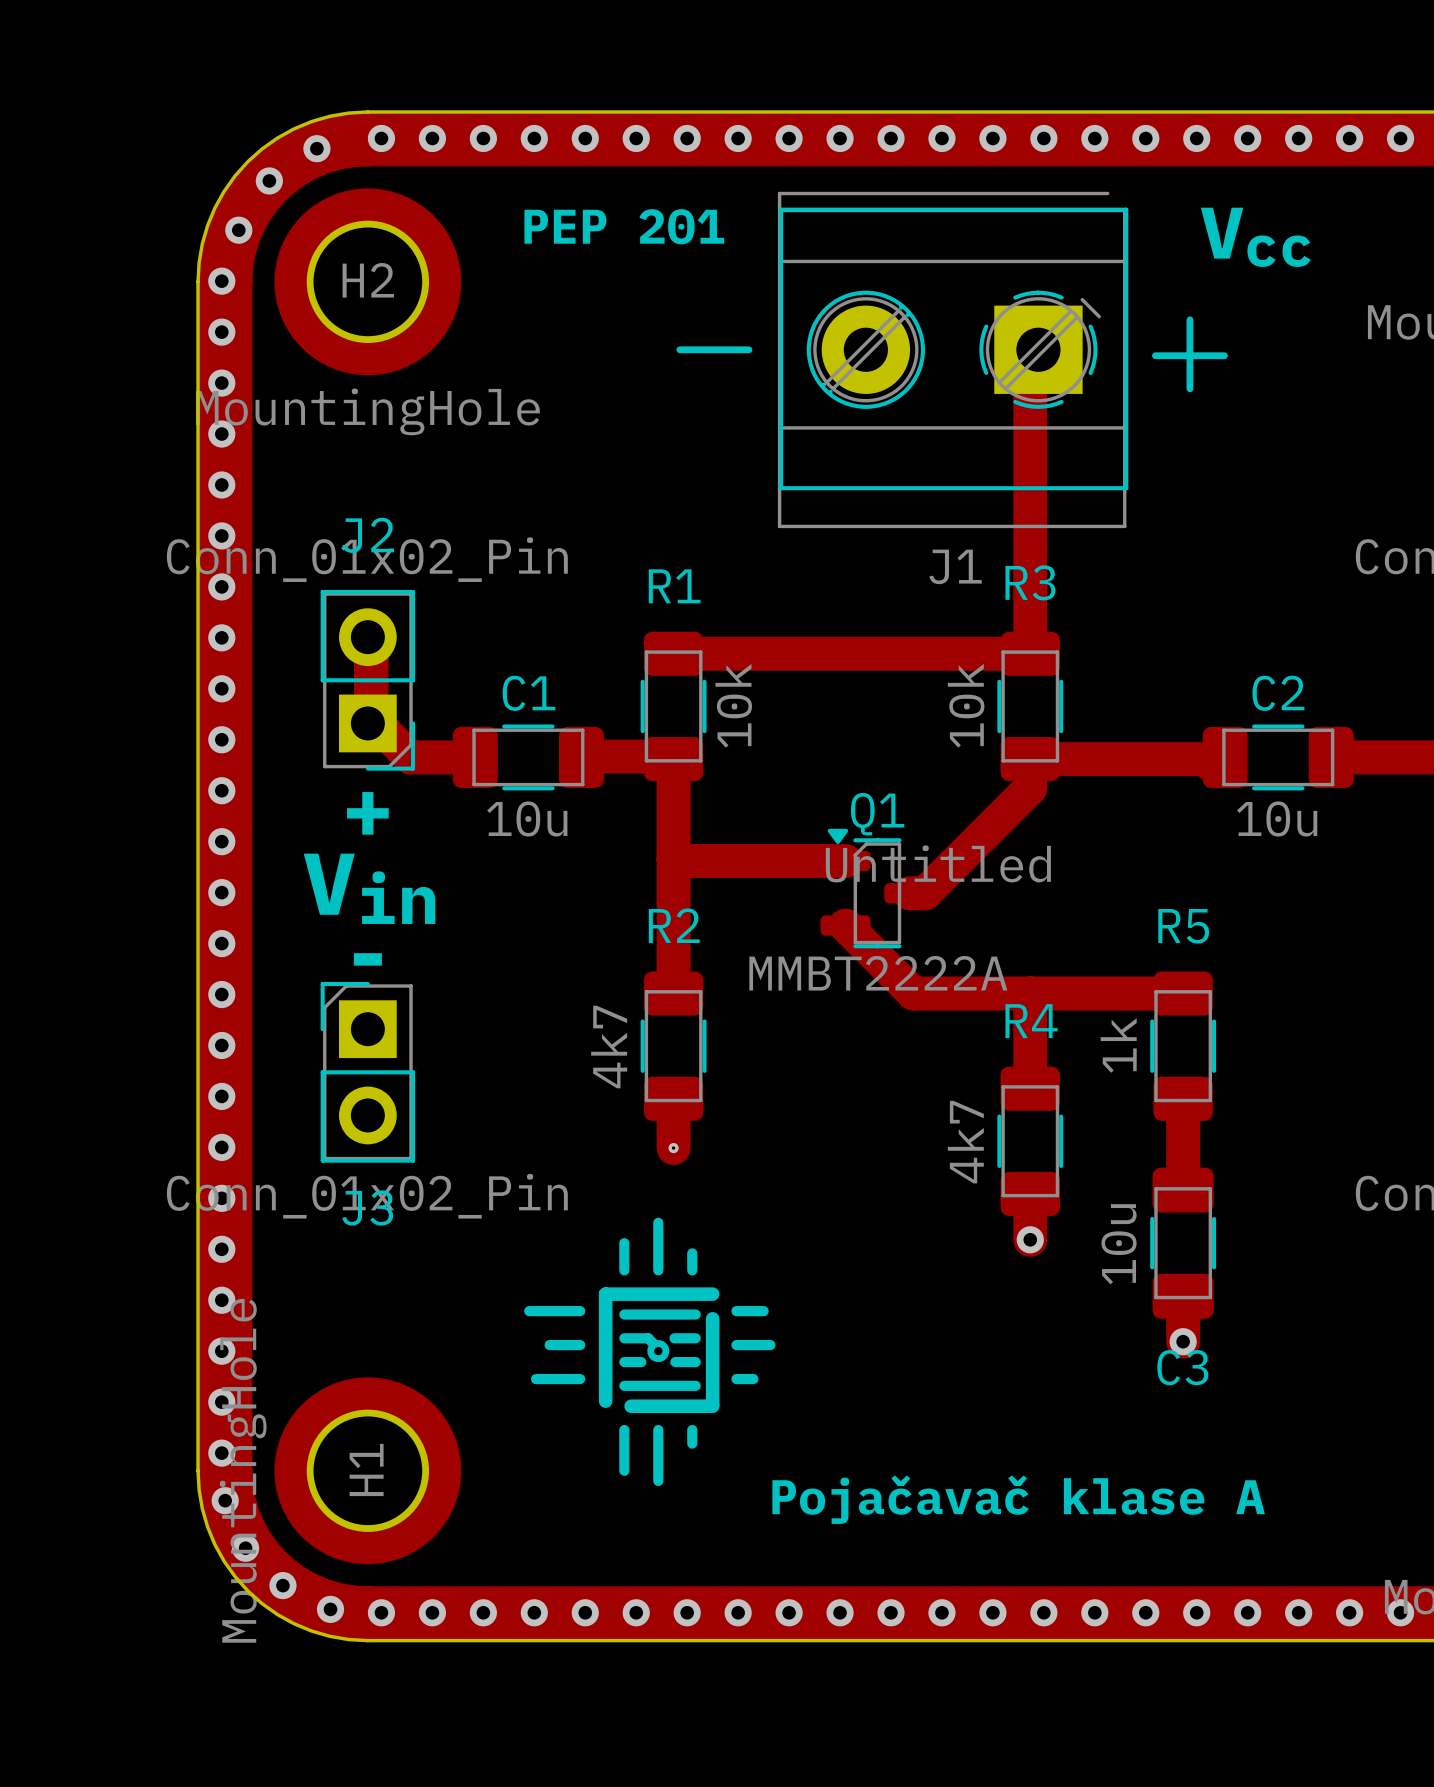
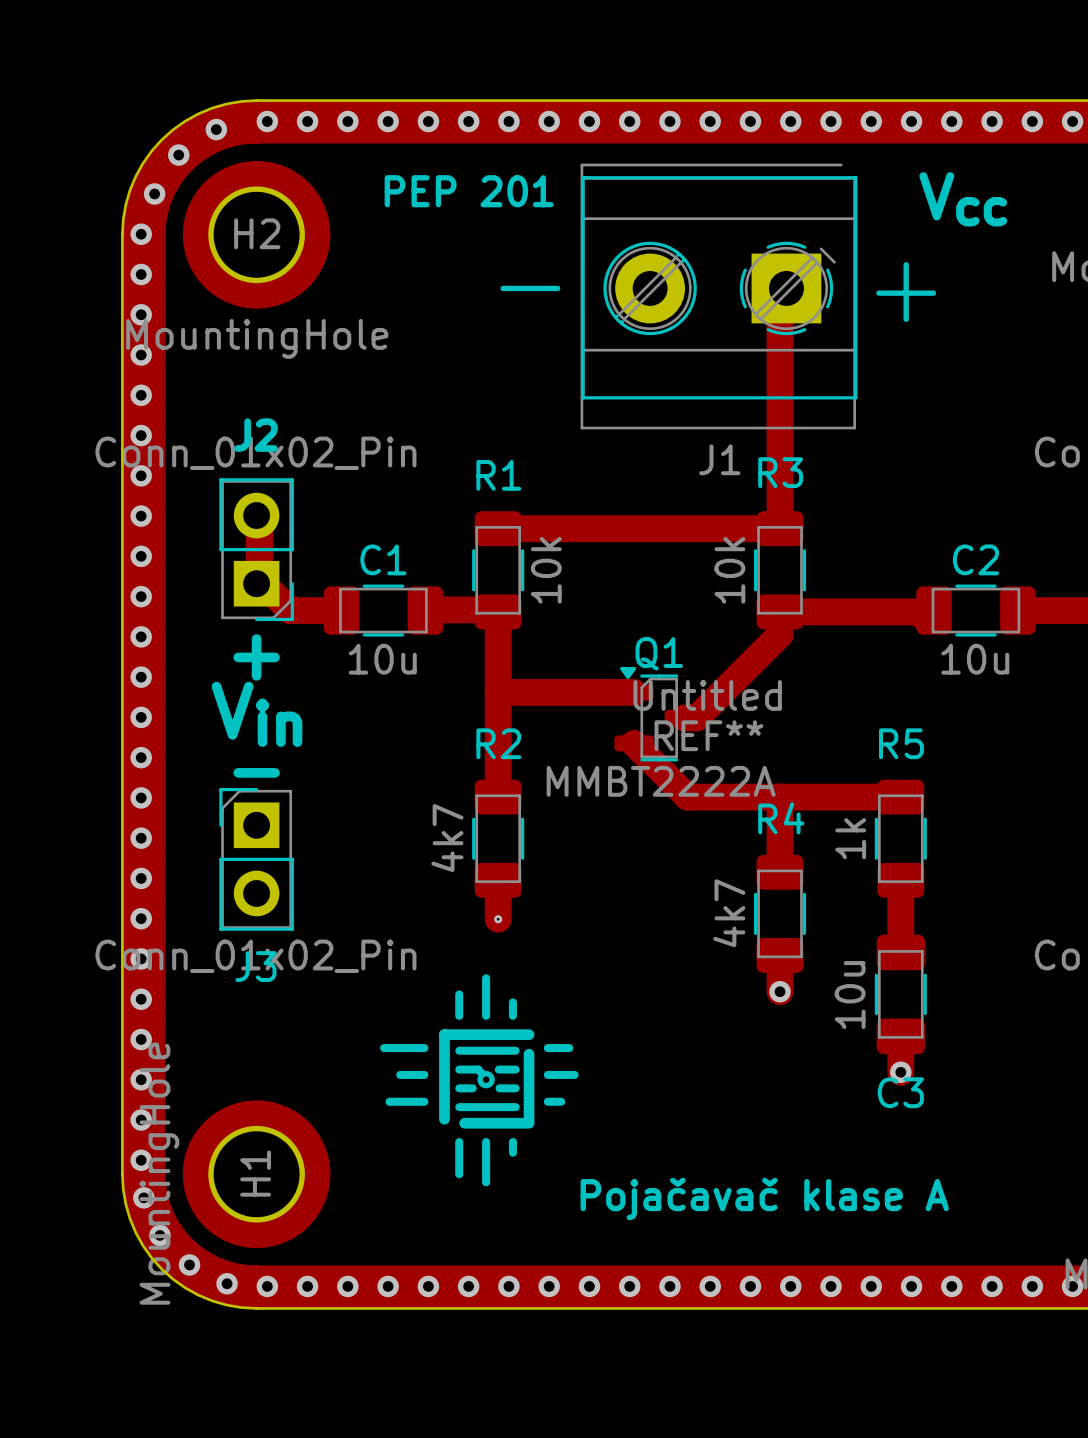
REF**: none -> Untitled (707, 715)

